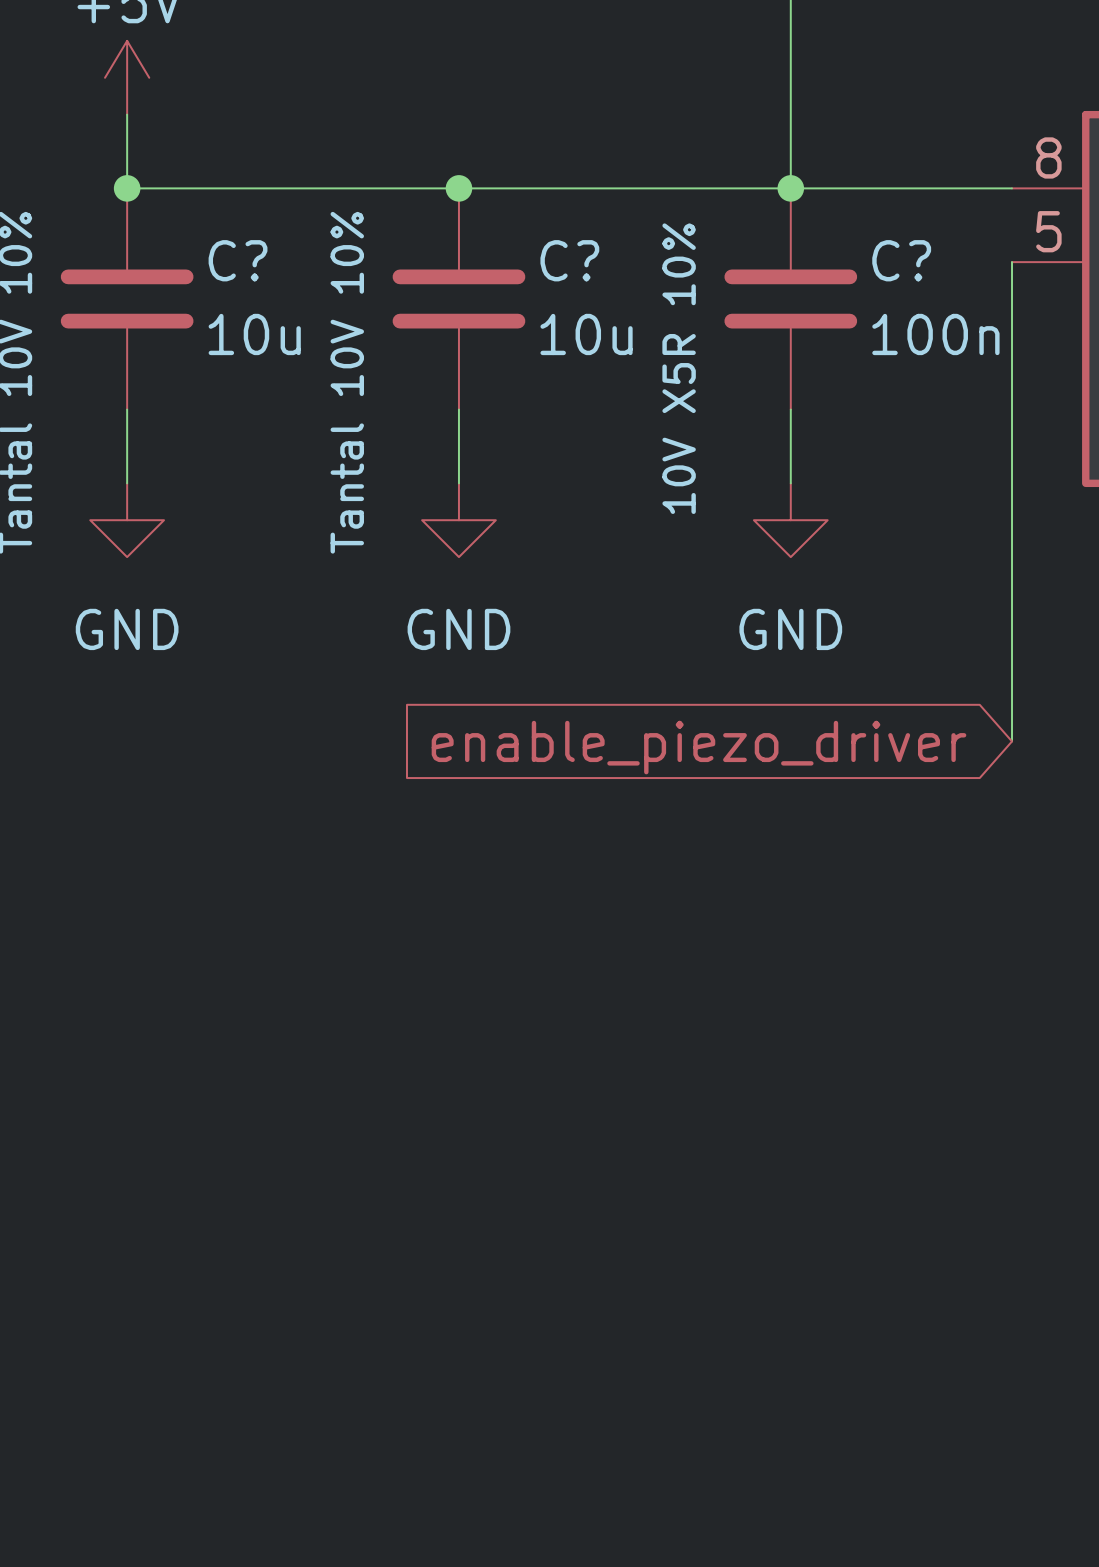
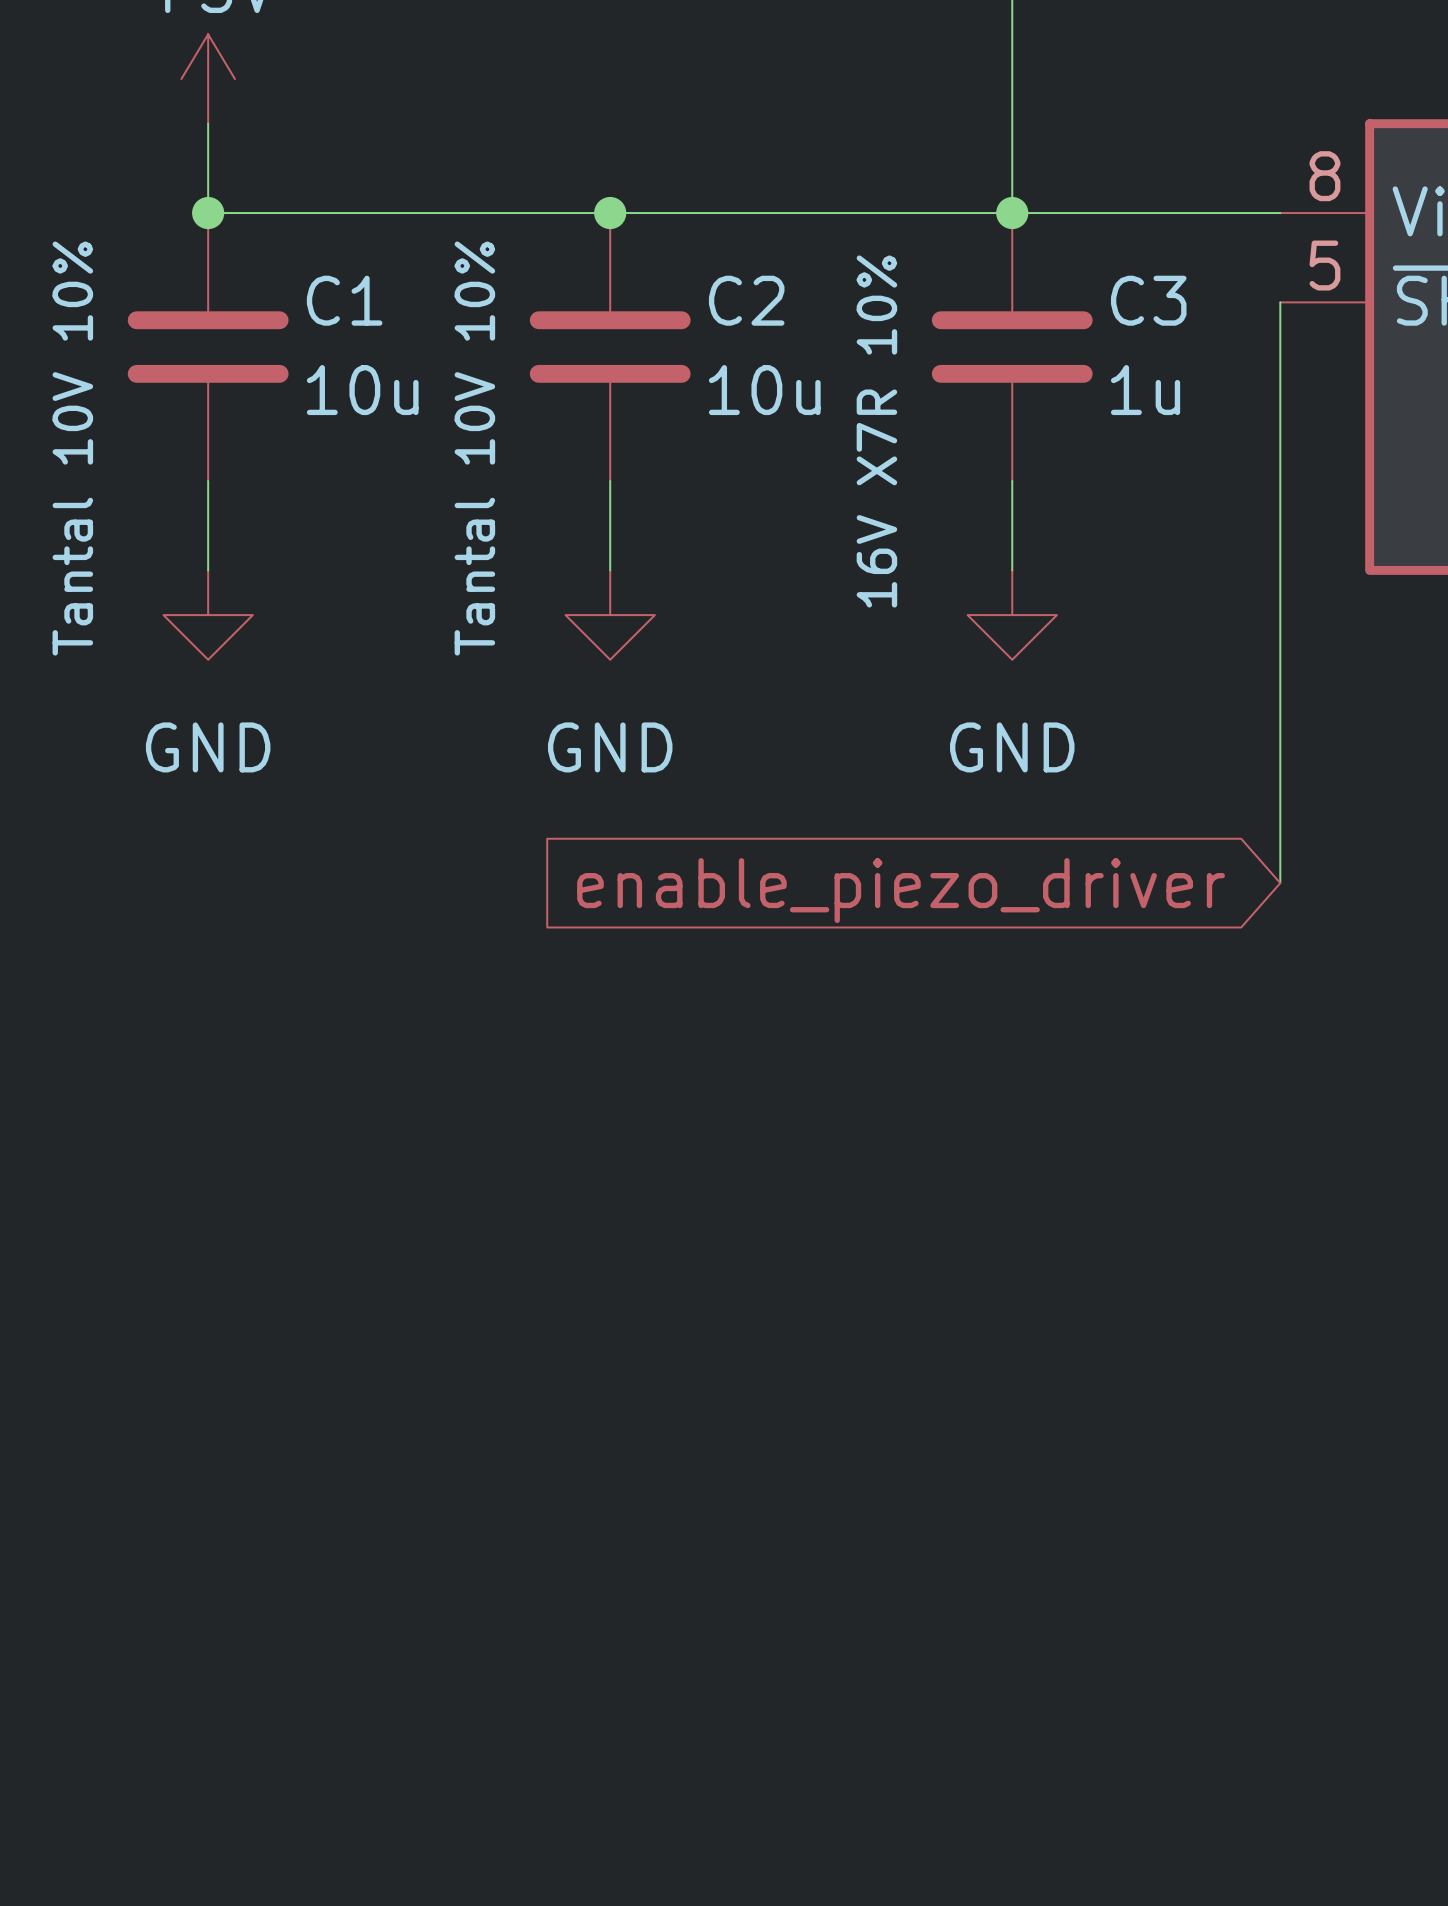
C? name: C? (238, 260) -> C1 (344, 300)
C? name: C? (569, 260) -> C2 (746, 300)
C? name: C? (901, 260) -> C3 (1148, 300)
C? value: 100n (935, 334) -> 1u (1145, 390)
C? text: 10V X5R 10% (679, 368) -> 16V X7R 10% (876, 431)

